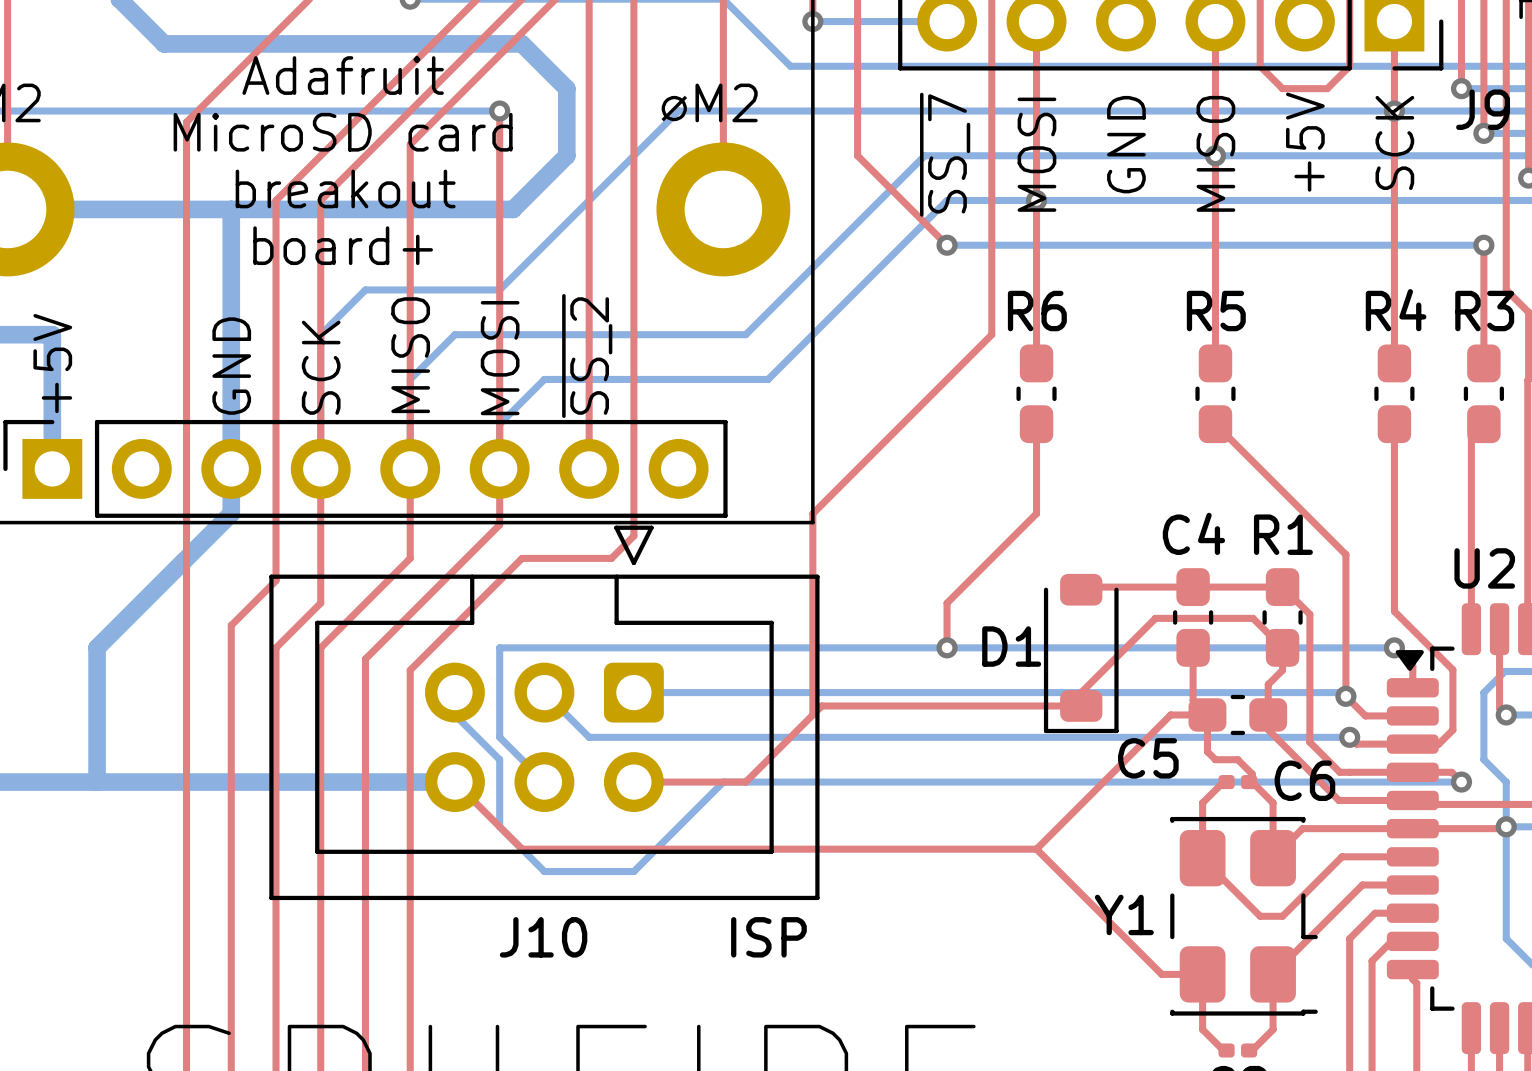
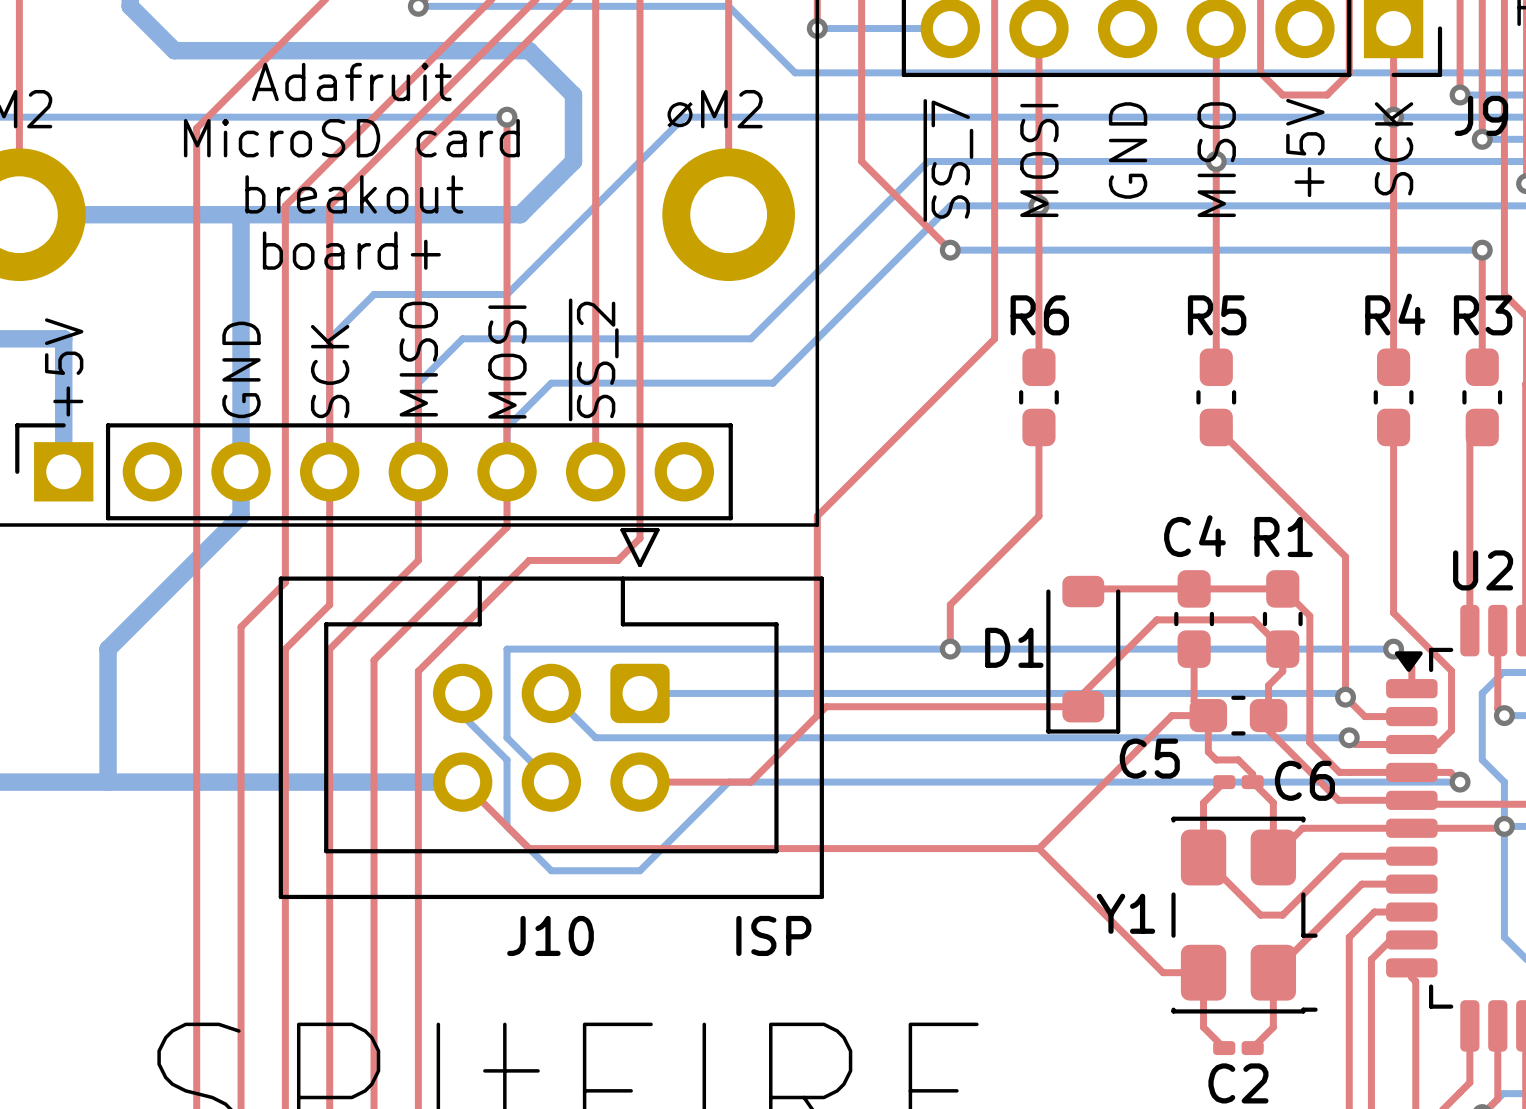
C6 footprint: [1218, 775, 1258, 790] -> [1213, 775, 1264, 790]
C2 footprint: [1218, 1043, 1258, 1058] -> [1213, 1041, 1264, 1056]

